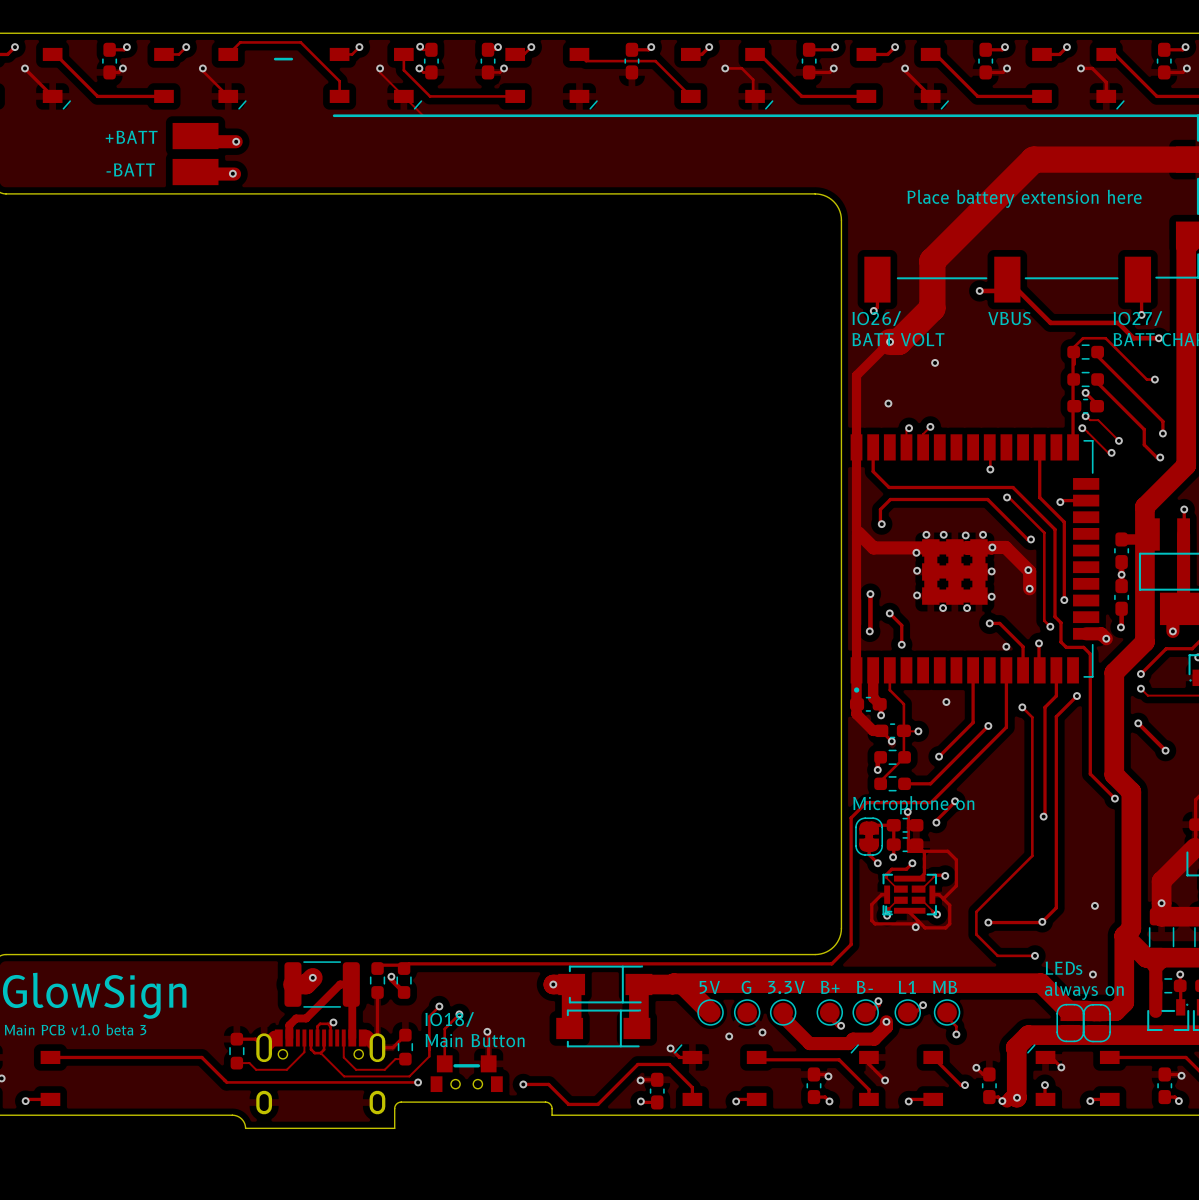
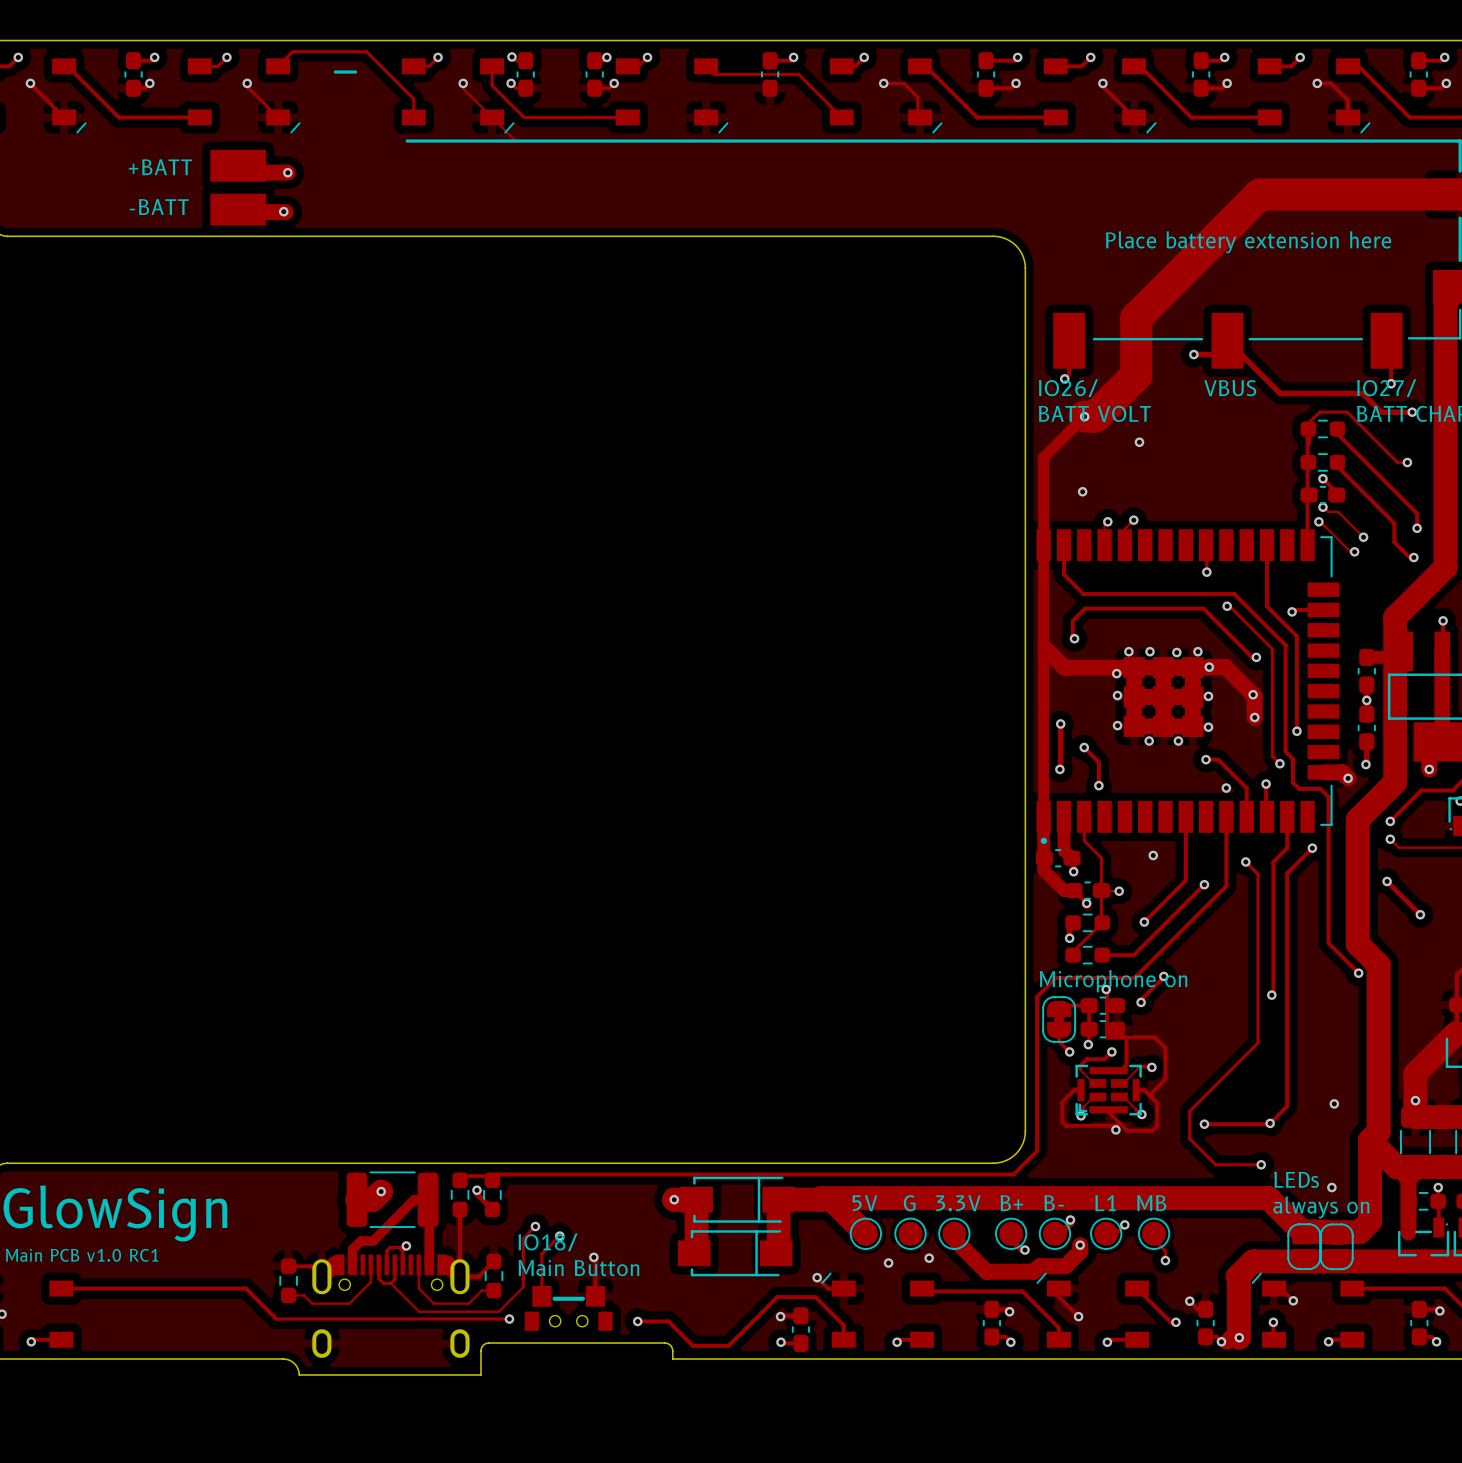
text: Main PCB v1.0 beta 3 (75, 1029) -> Main PCB v1.0 RC1 (82, 1255)

